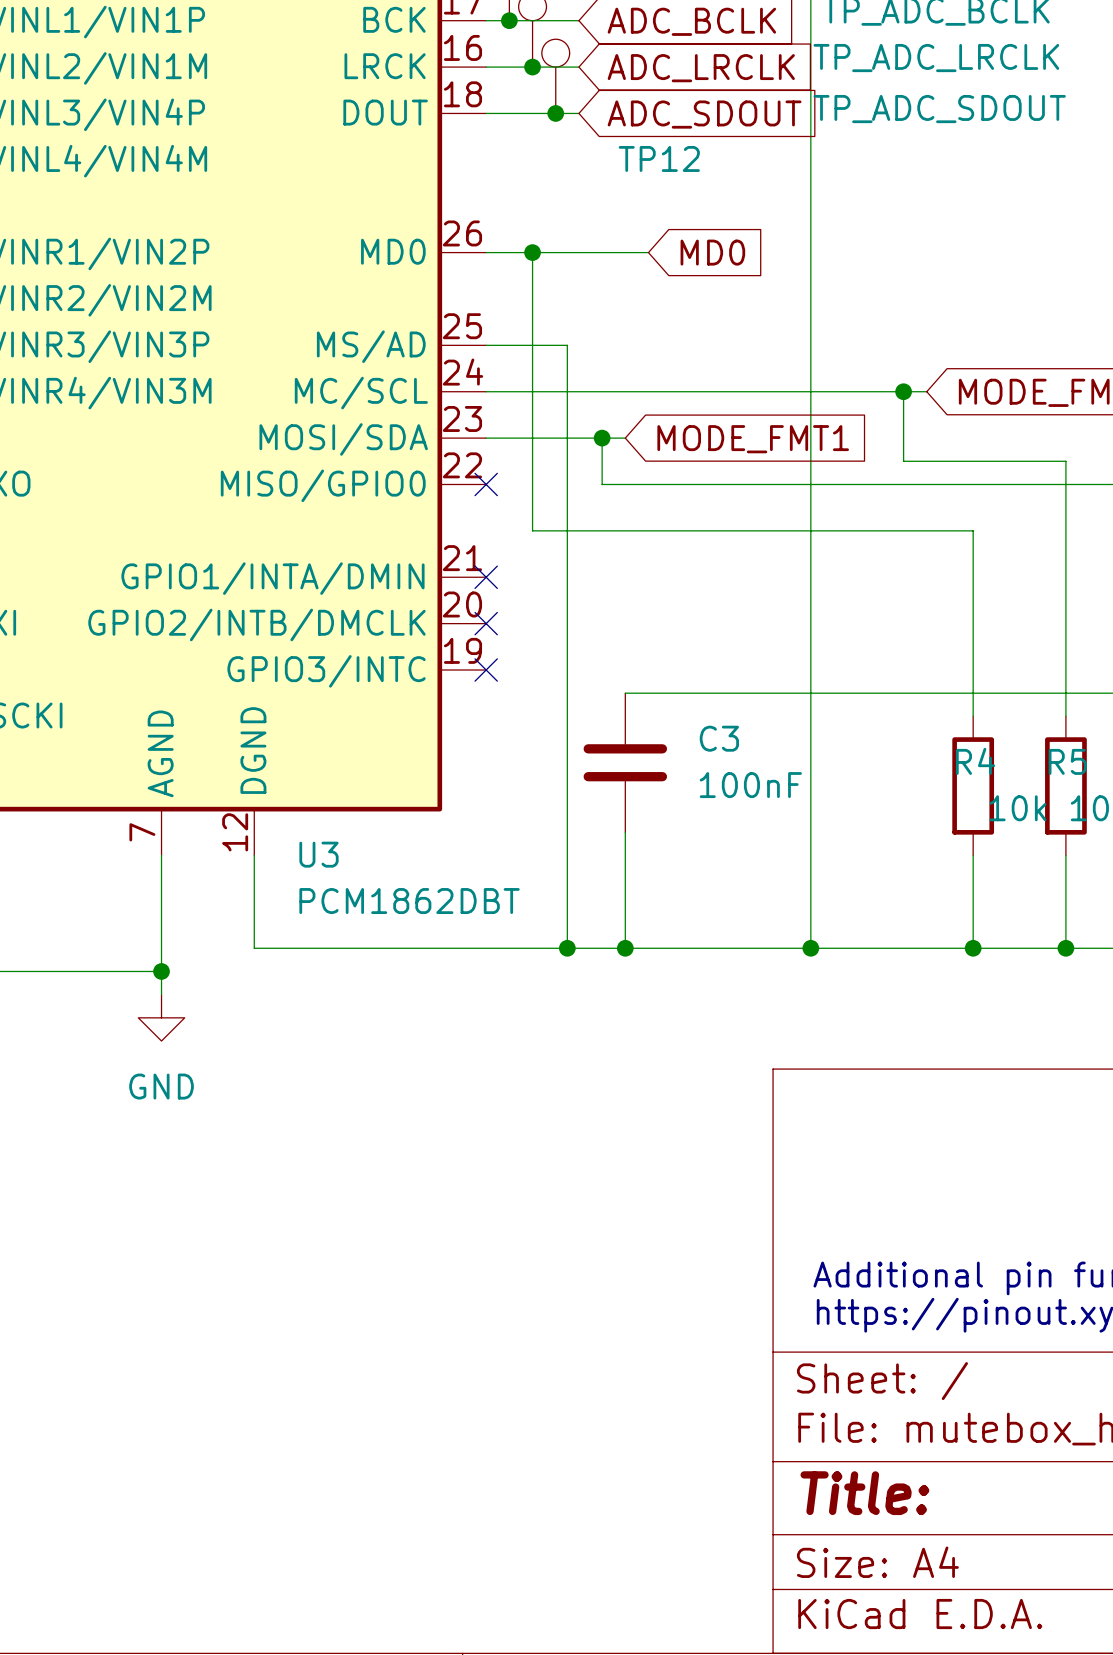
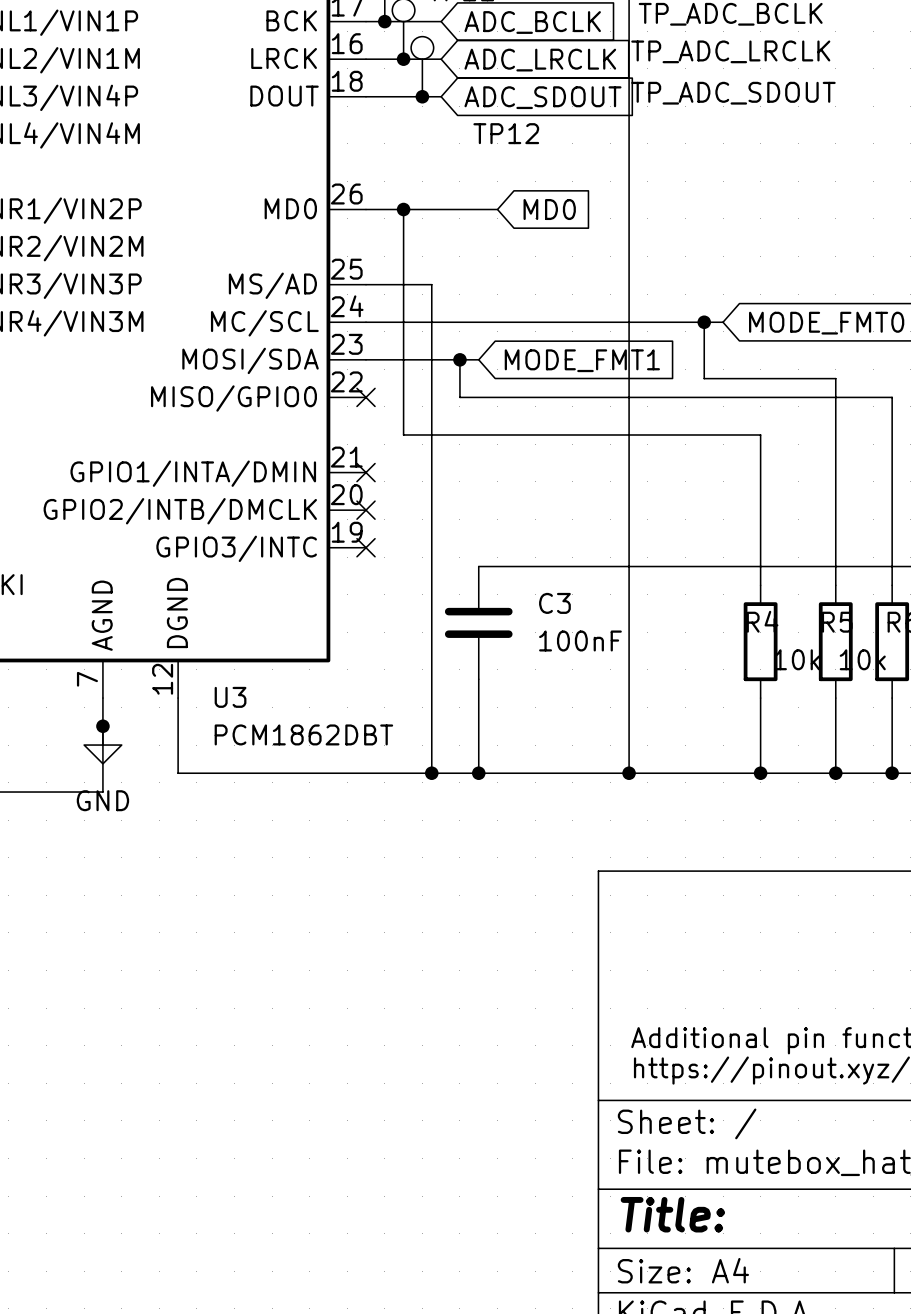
wire: (161, 971) (161, 994) -> none
junction position: (161, 971) -> (102, 726)
power symbol position: GND (161, 1017) -> GND (102, 745)

